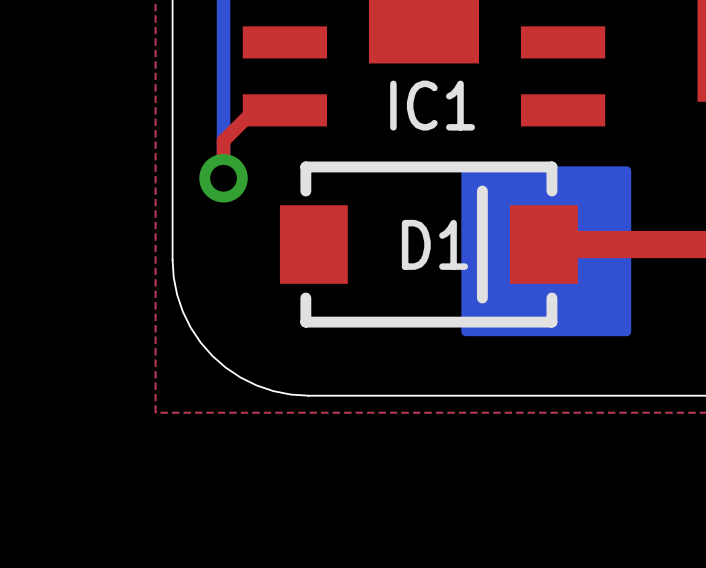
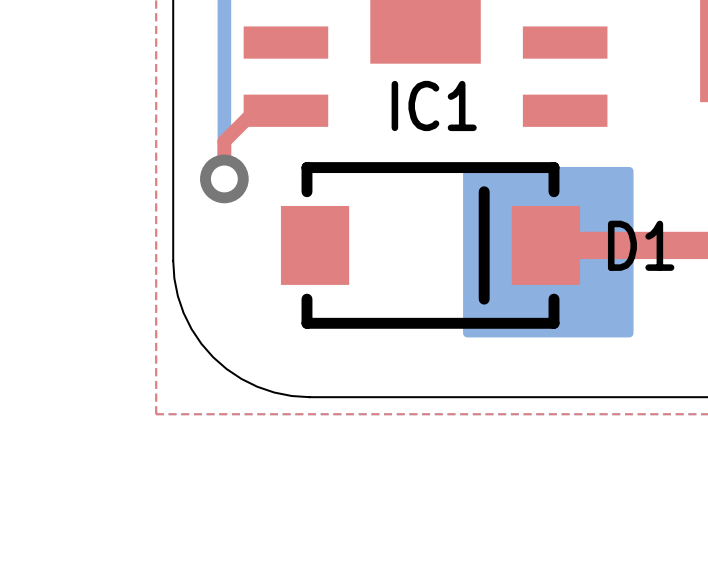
D1 name position: D1 (434, 244) -> D1 (641, 245)

